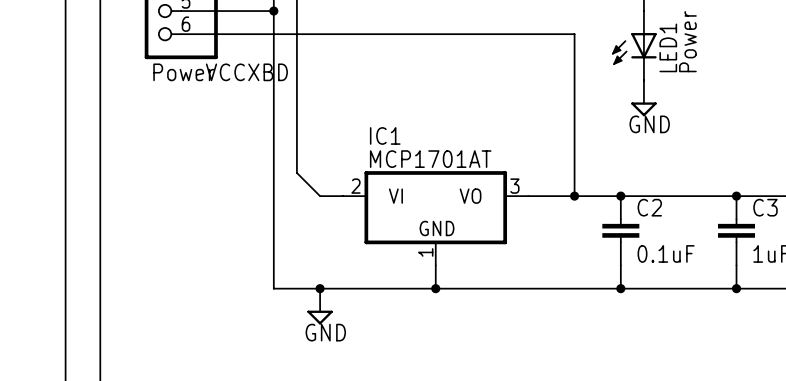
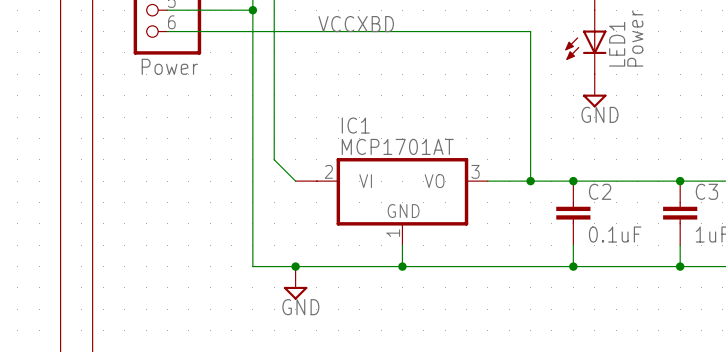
label position: VCCXBD (246, 72) -> VCCXBD (356, 24)

